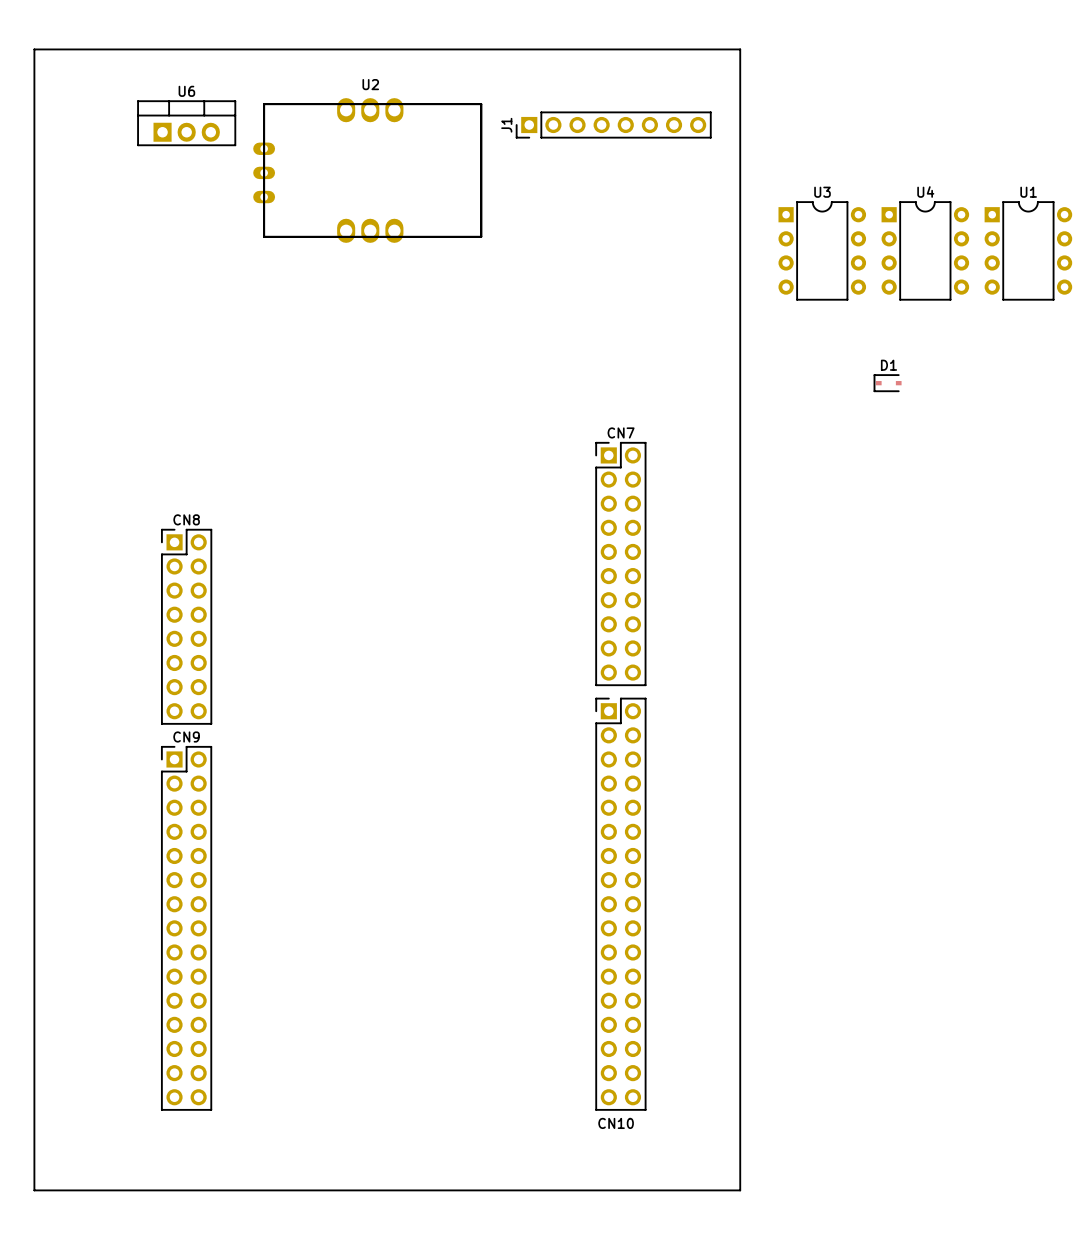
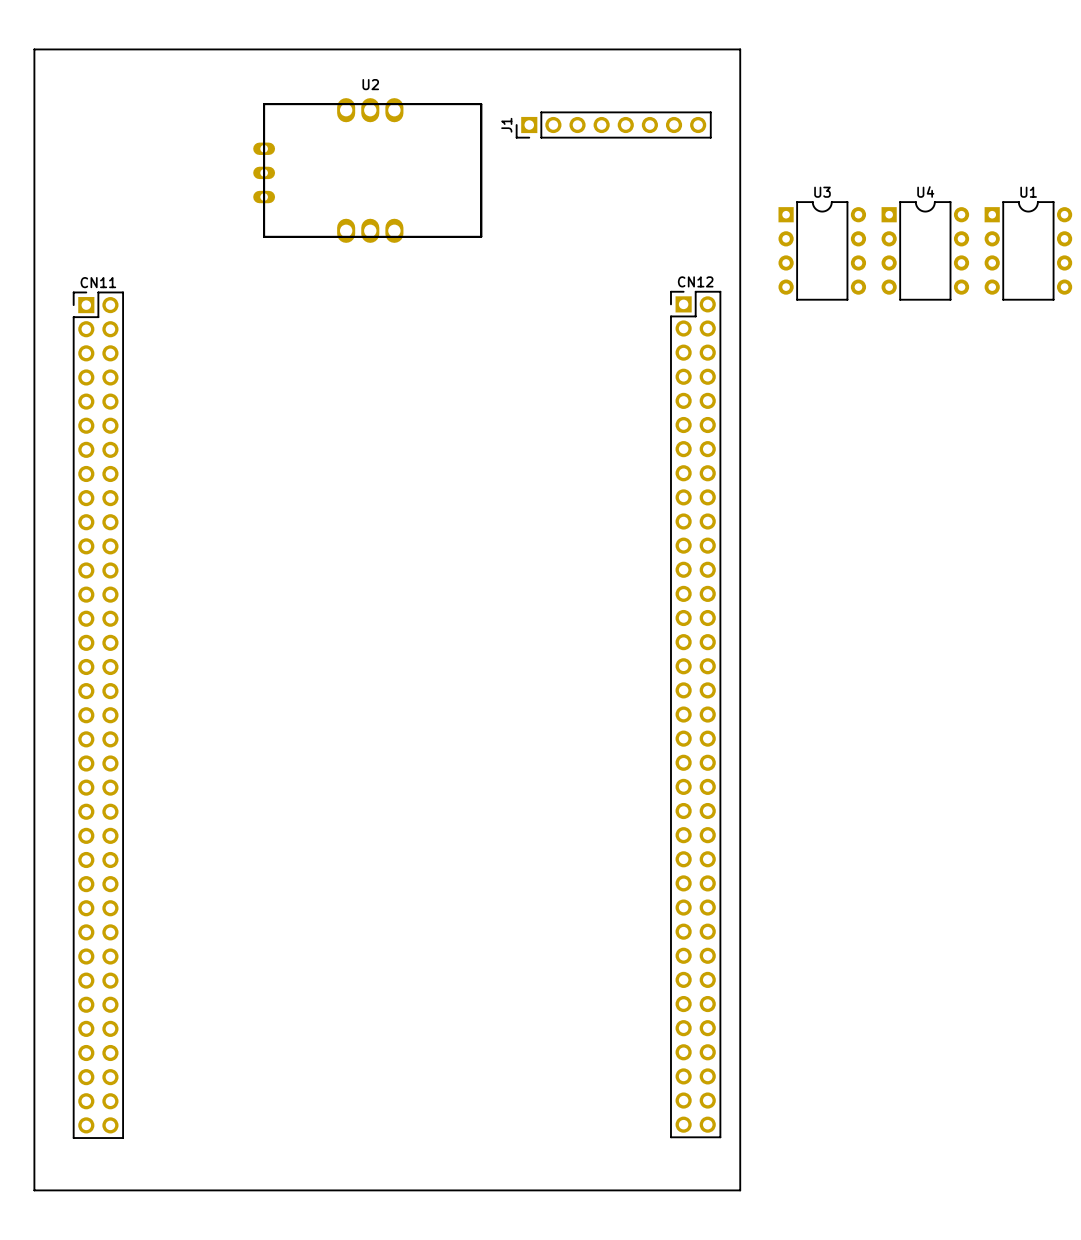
U6: (186, 123) -> none
D1: (887, 383) -> none
CN7: (620, 564) -> none
CN8: (186, 626) -> none
CN12: none -> (695, 714)
CN11: none -> (98, 715)
CN10: (620, 904) -> none
CN9: (186, 928) -> none

